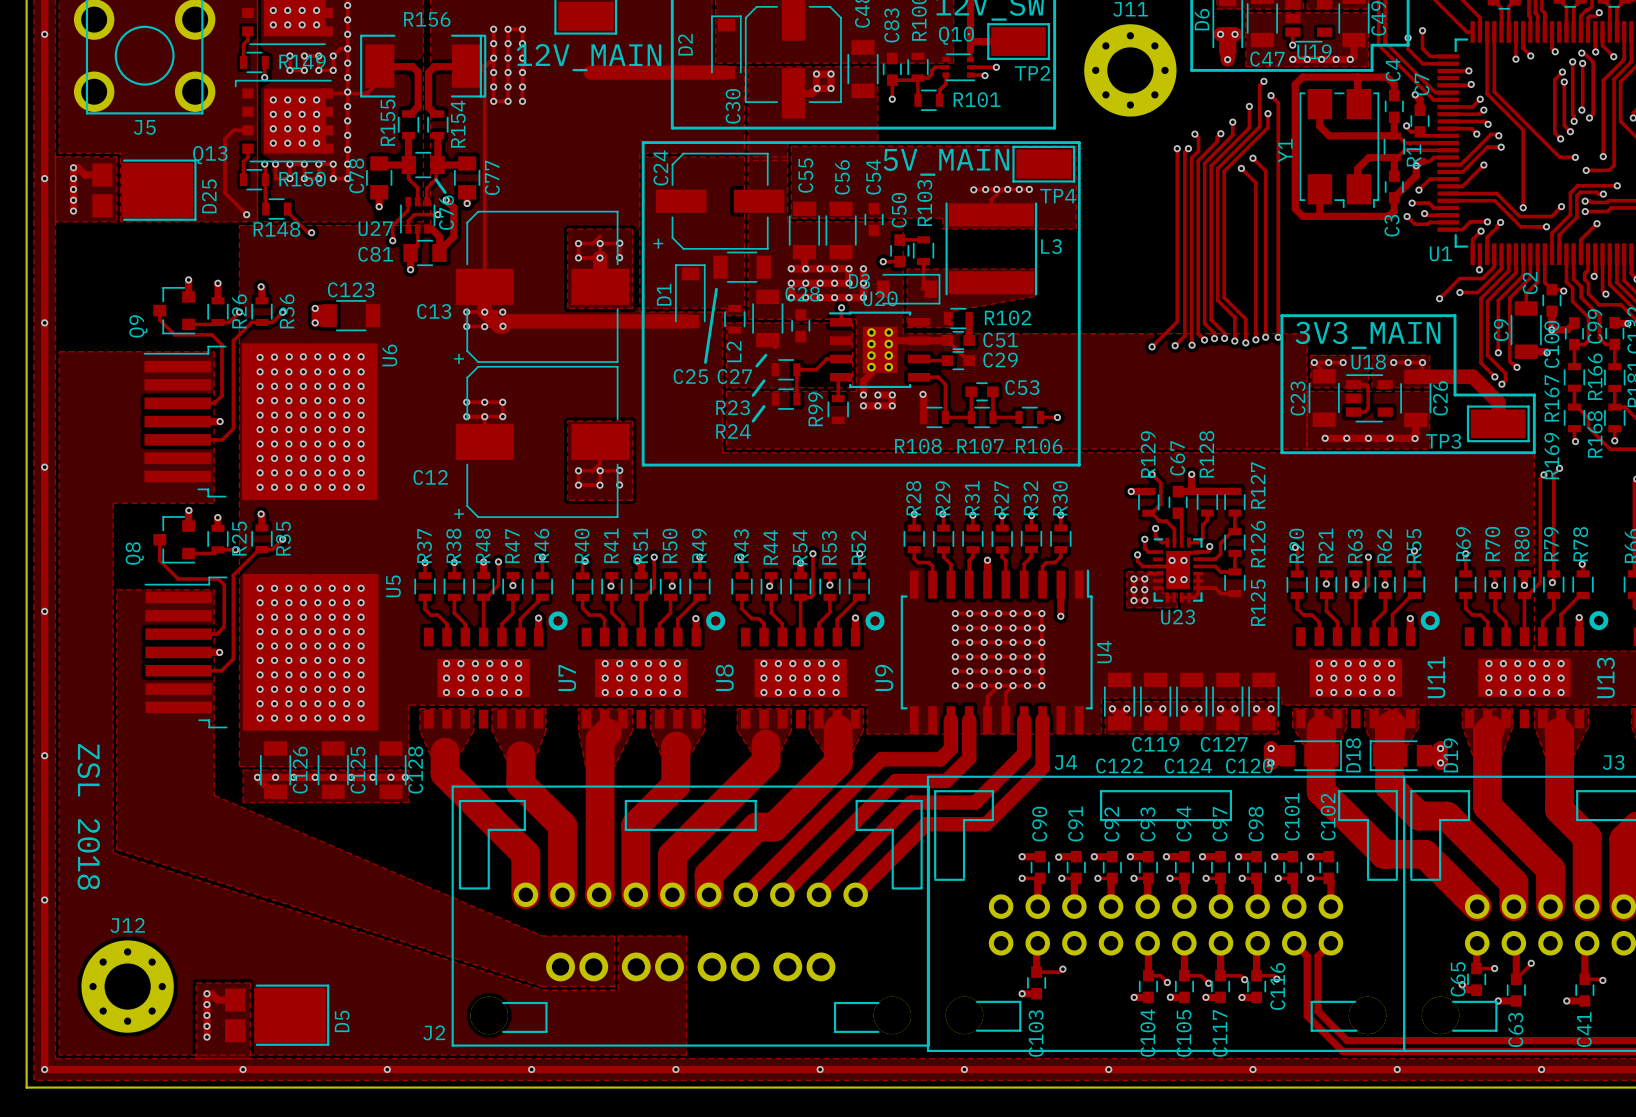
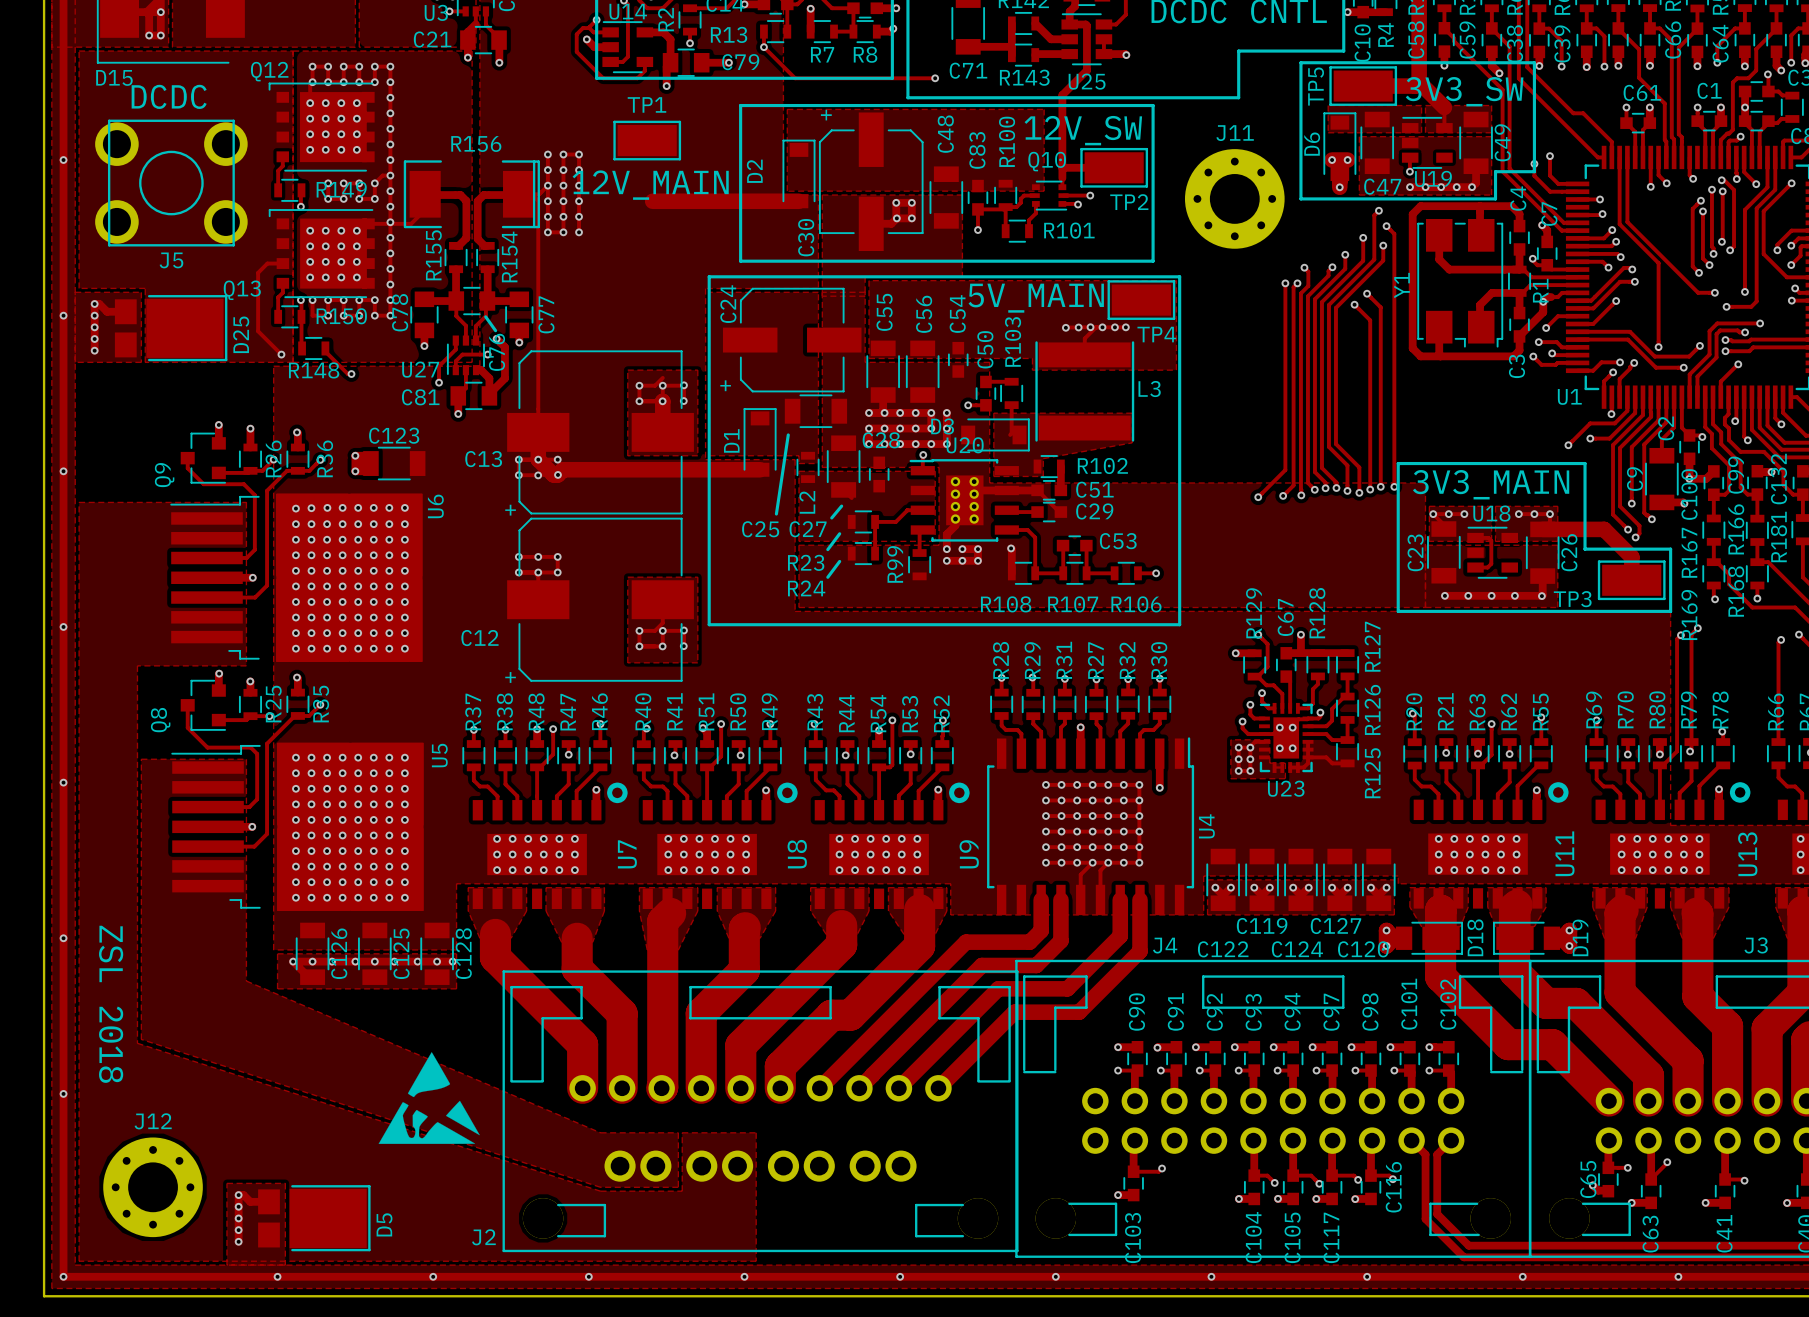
drawing: none -> [378, 1052, 480, 1144]

